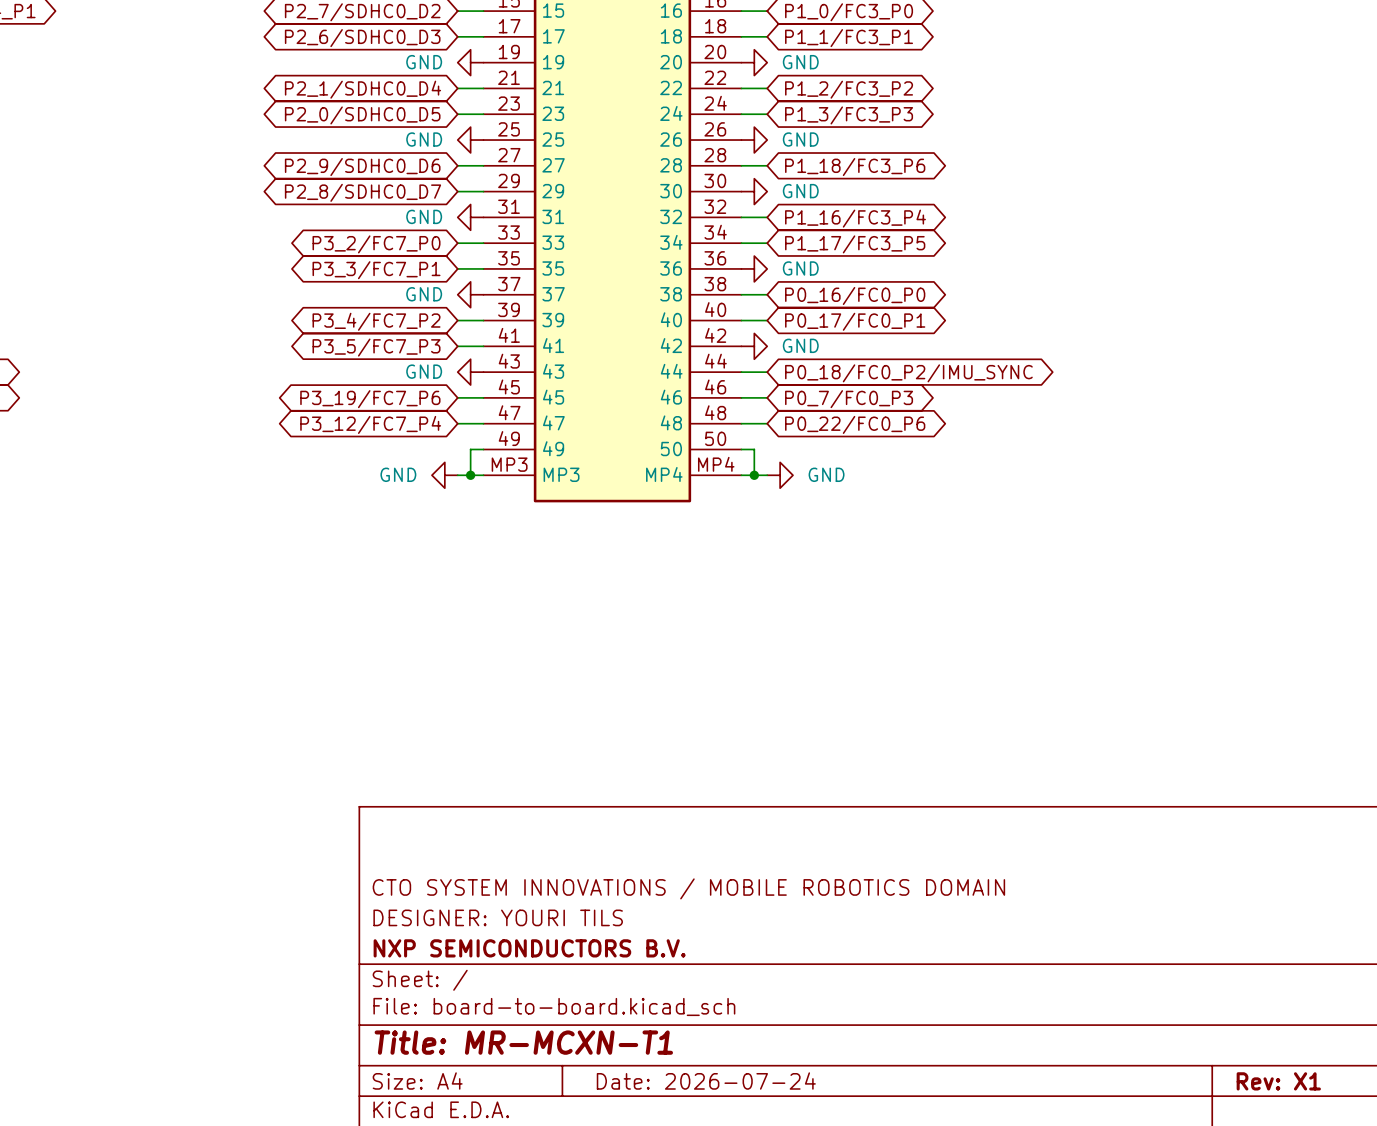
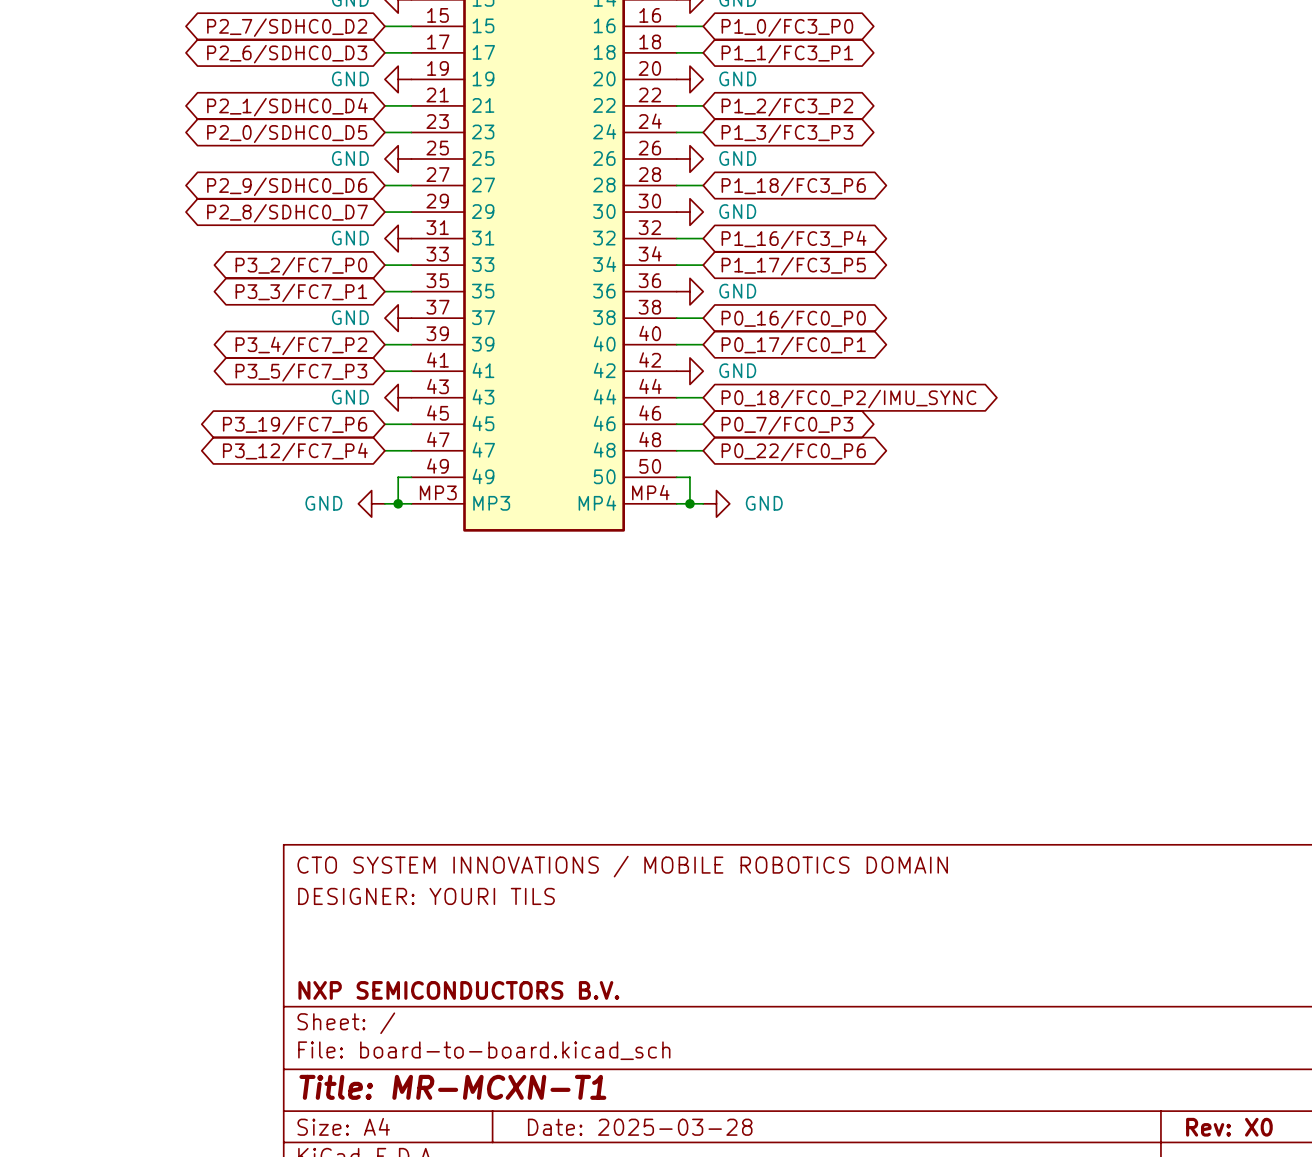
title block position: CTO SYSTEM INNOVATIONS / MOBILE ROBOTICS DOMAIN (688, 888) -> CTO SYSTEM INNOVATIONS / MOBILE ROBOTICS DOMAIN (622, 866)
title block position: DESIGNER: YOURI TILS (498, 917) -> DESIGNER: YOURI TILS (426, 896)
title block: Date: 2026-07-24 (706, 1081) -> Date: 2025-03-28 (640, 1127)
title block: Rev: X1 (1278, 1081) -> Rev: X0 (1229, 1127)

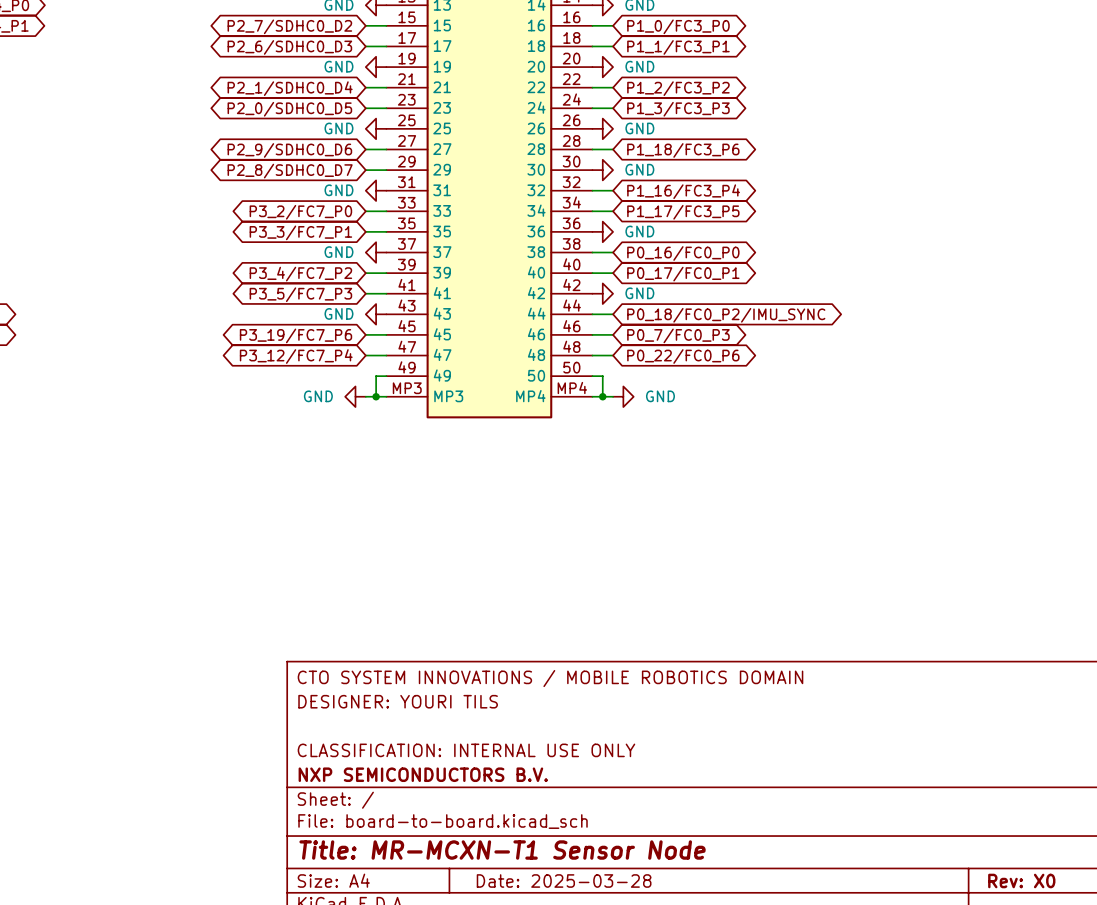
title block: none -> CLASSIFICATION: INTERNAL USE ONLY (466, 750)
title block: Title: MR-MCXN-T1 (452, 1087) -> Title: MR-MCXN-T1 Sensor Node (502, 850)

